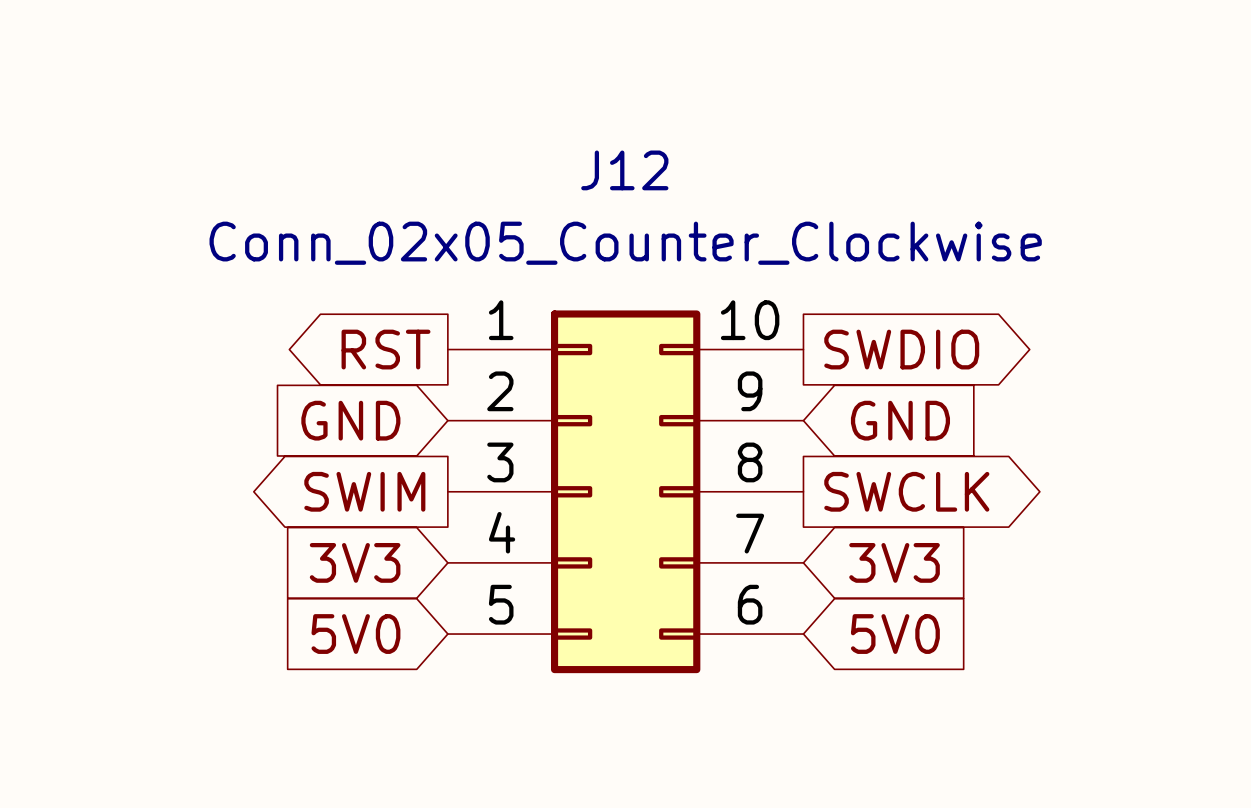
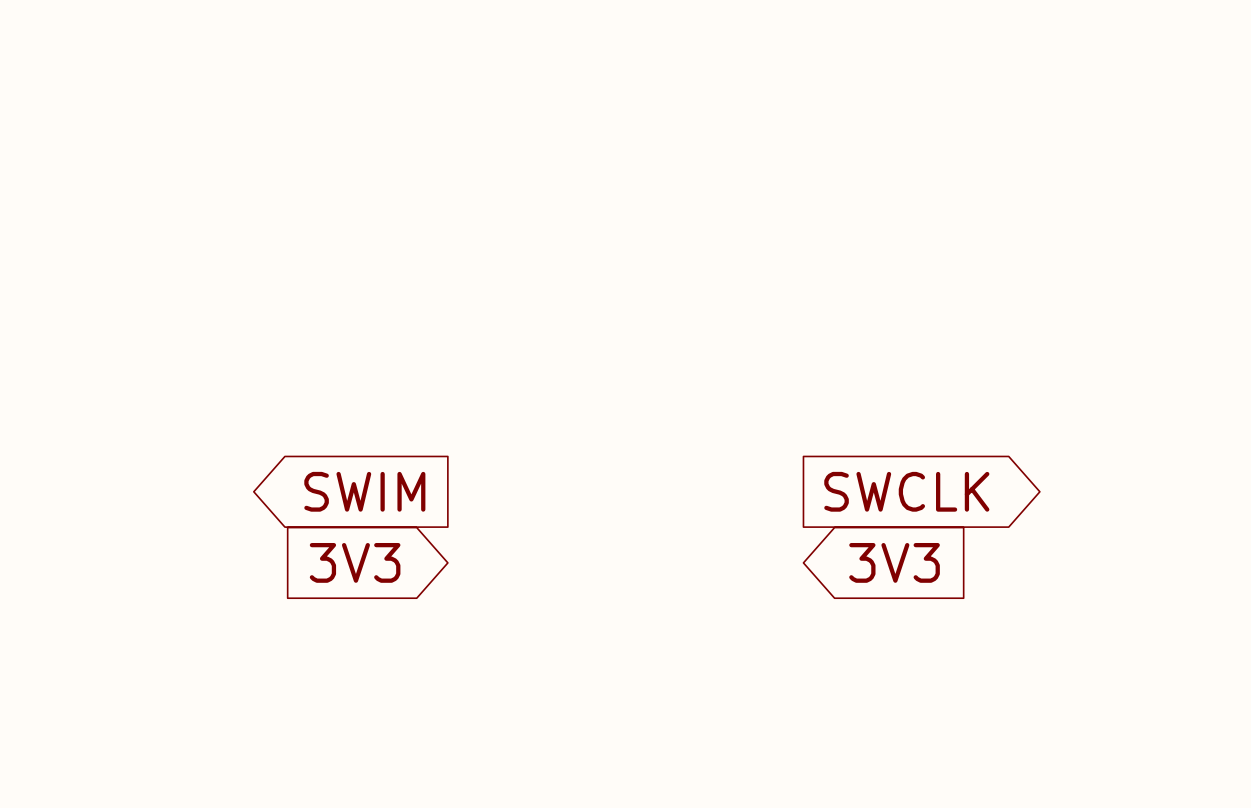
global label: RST (386, 349) -> none
global label: SWDIO (901, 349) -> none
global label: GND (350, 420) -> none
global label: GND (900, 420) -> none
J12: Conn_02x05_Counter_Clockwise (625, 491) -> none
global label: 5V0 (355, 634) -> none
global label: 5V0 (895, 634) -> none

